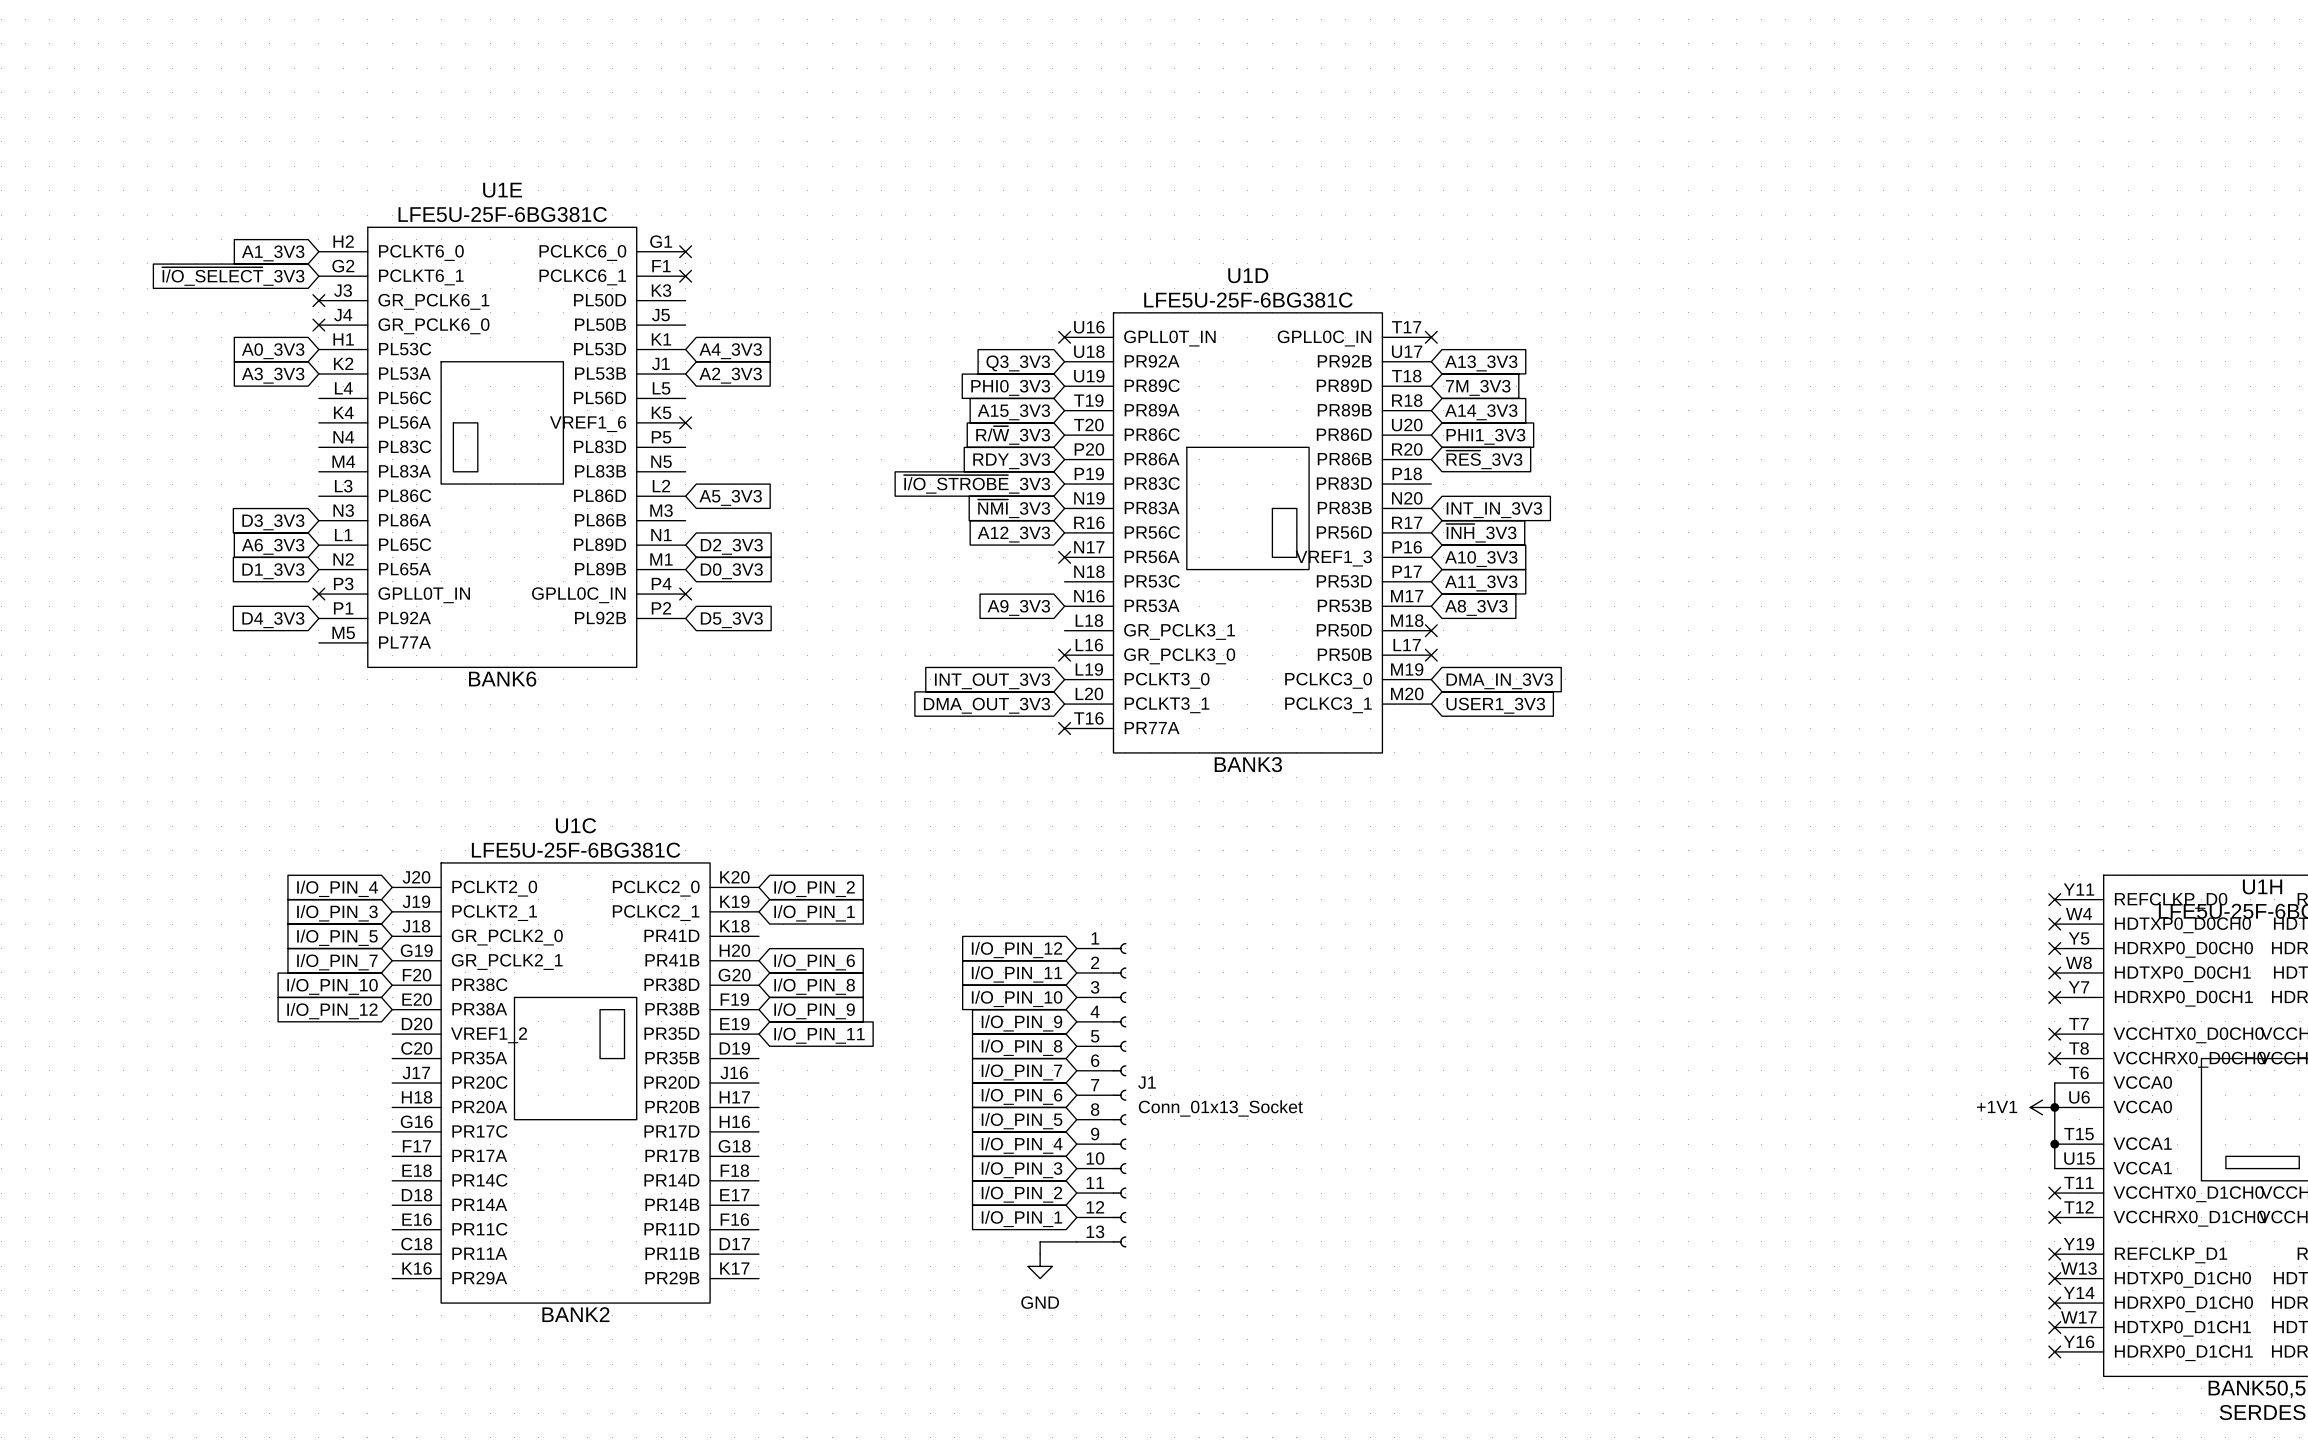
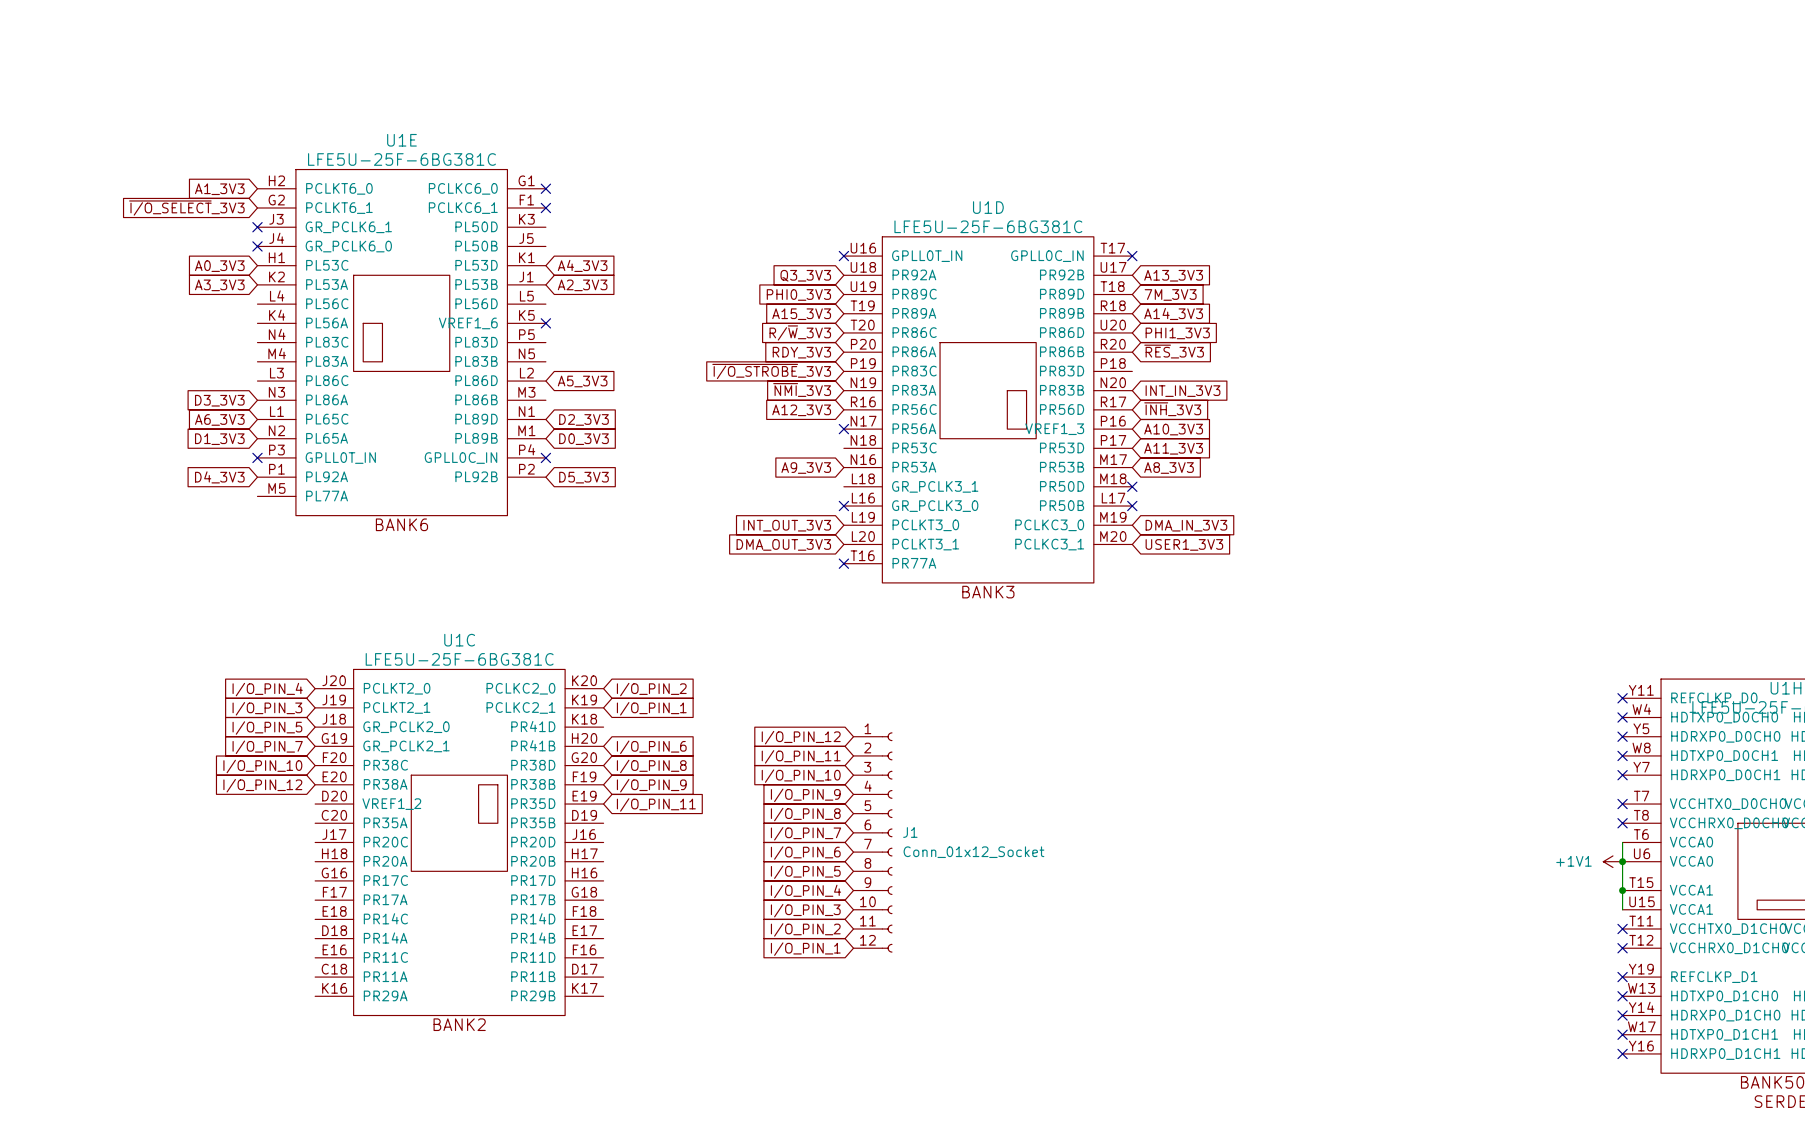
J1 symbol: [1076, 942, 1127, 1248] -> [853, 732, 893, 953]
J1 value: Conn_01x13_Socket (1220, 1108) -> Conn_01x12_Socket (973, 852)
wire: (1076, 1241) (1040, 1241) (1040, 1254) -> none
power symbol: GND (1040, 1266) -> none

